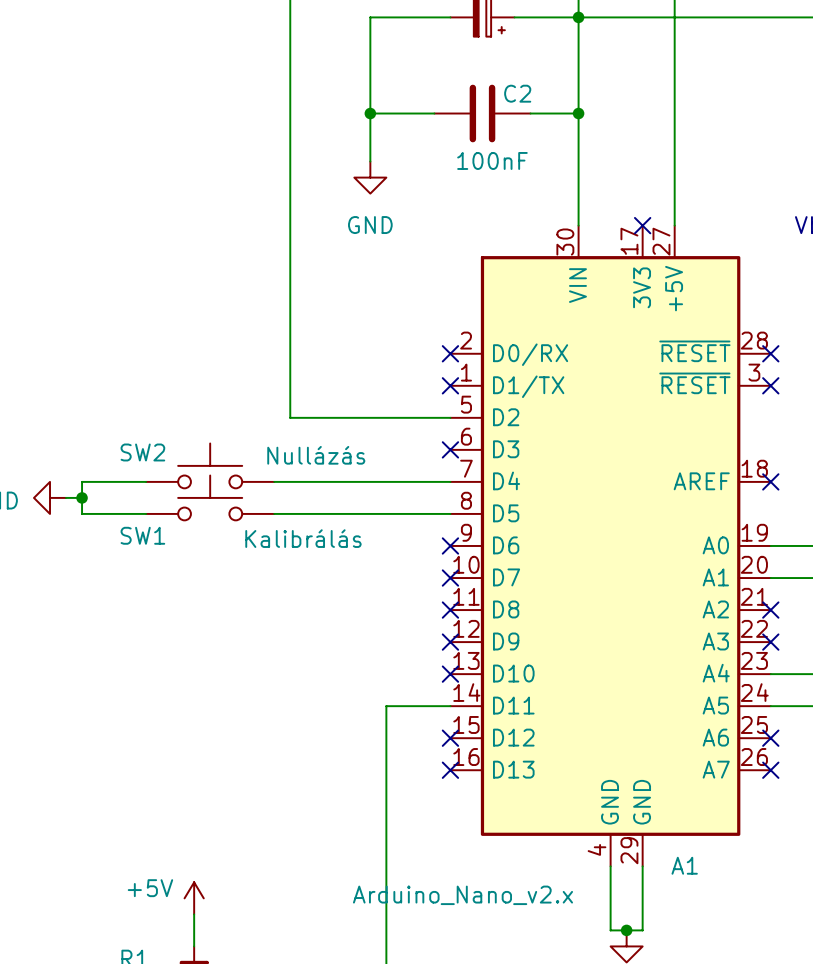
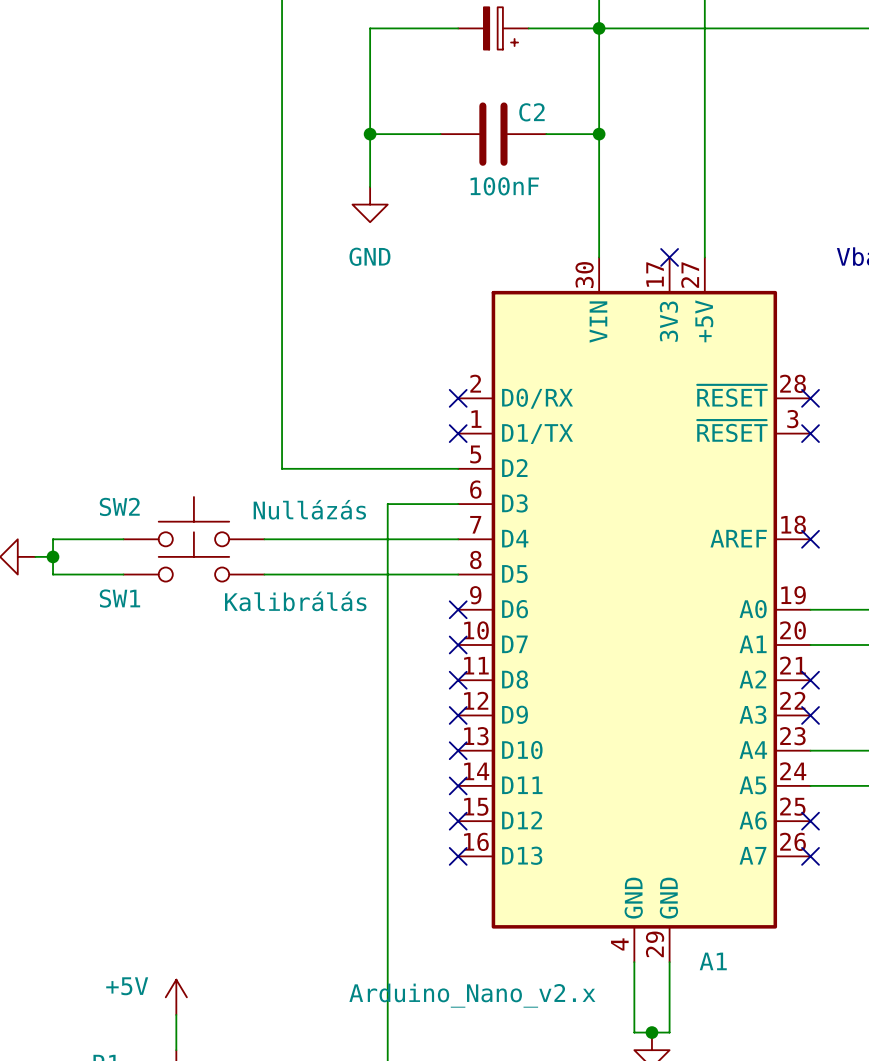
no-connect mark: (450, 449) -> none
wire: (386, 706) (450, 706) -> (387, 785) (387, 504) (458, 504)
no-connect mark: none -> (458, 785)

